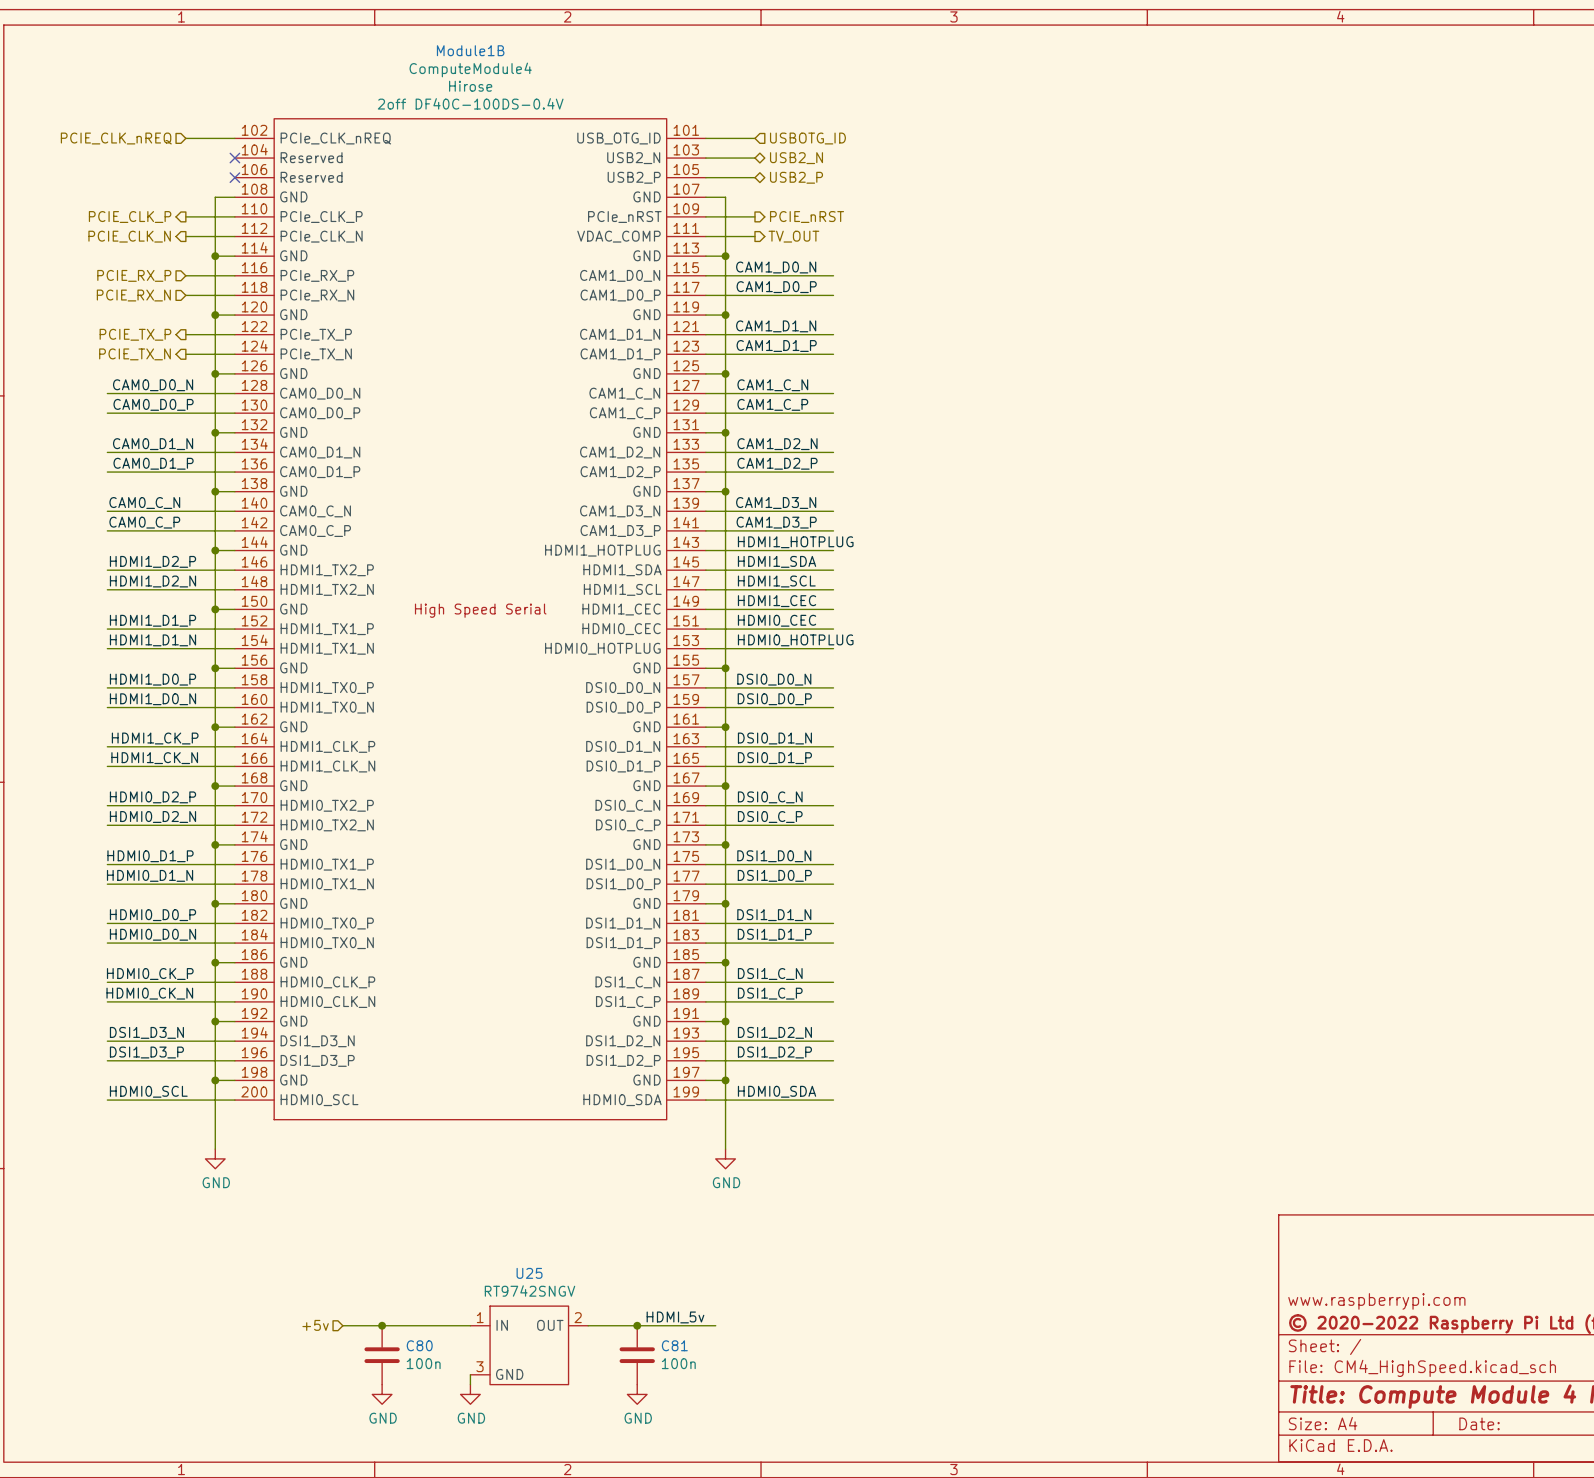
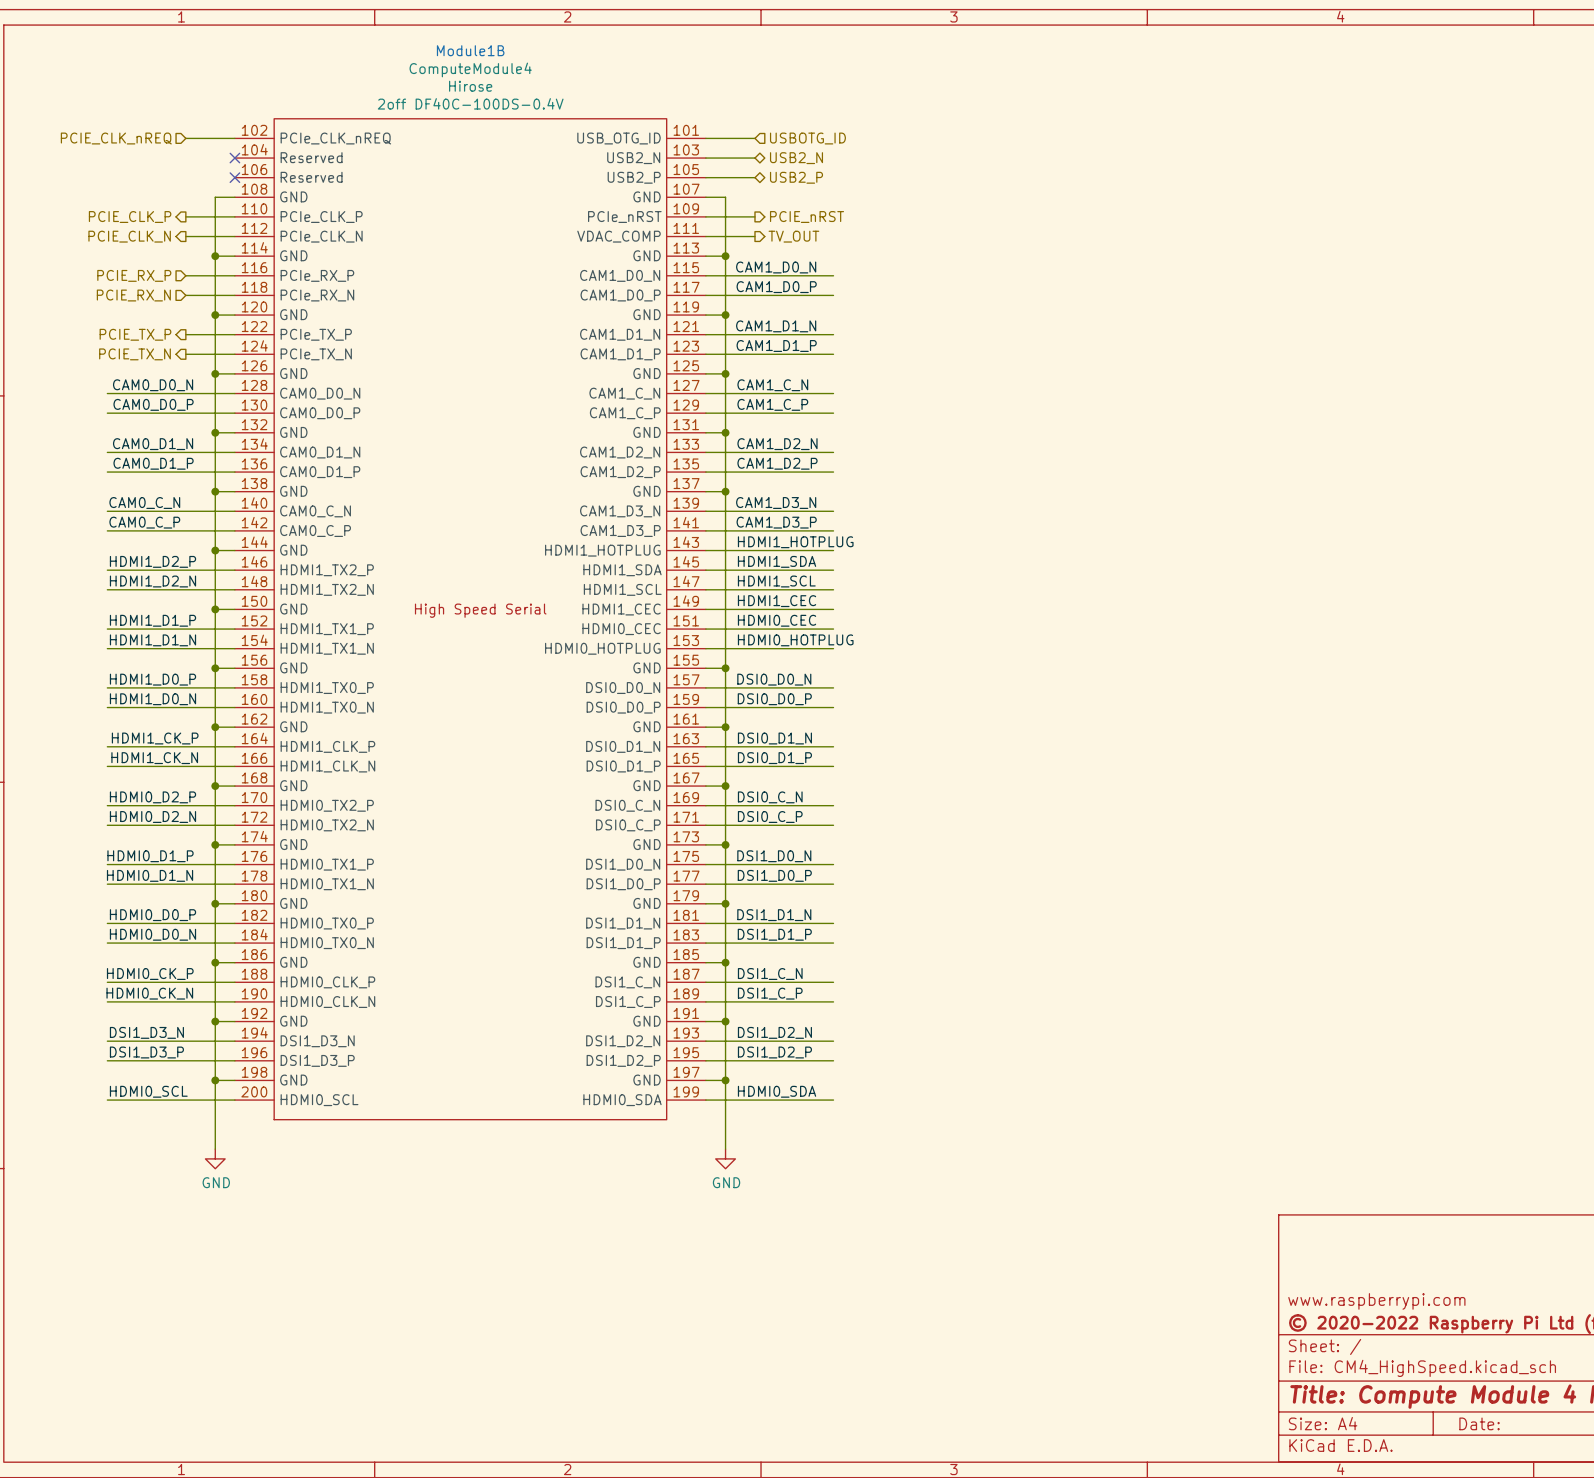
label: HDMI_5v (675, 1317) -> none
hierarchical label: +5v (315, 1325) -> none
wire: (342, 1325) (470, 1325) -> none
junction: (382, 1325) -> none
wire: (588, 1325) (715, 1325) -> none
junction: (637, 1325) -> none
U25: RT9742SNGV (529, 1345) -> none
C80: 100n (382, 1355) -> none
C81: 100n (637, 1355) -> none
wire: (470, 1374) (470, 1384) -> none
power symbol: GND (382, 1394) -> none
power symbol: GND (470, 1394) -> none
power symbol: GND (637, 1394) -> none

